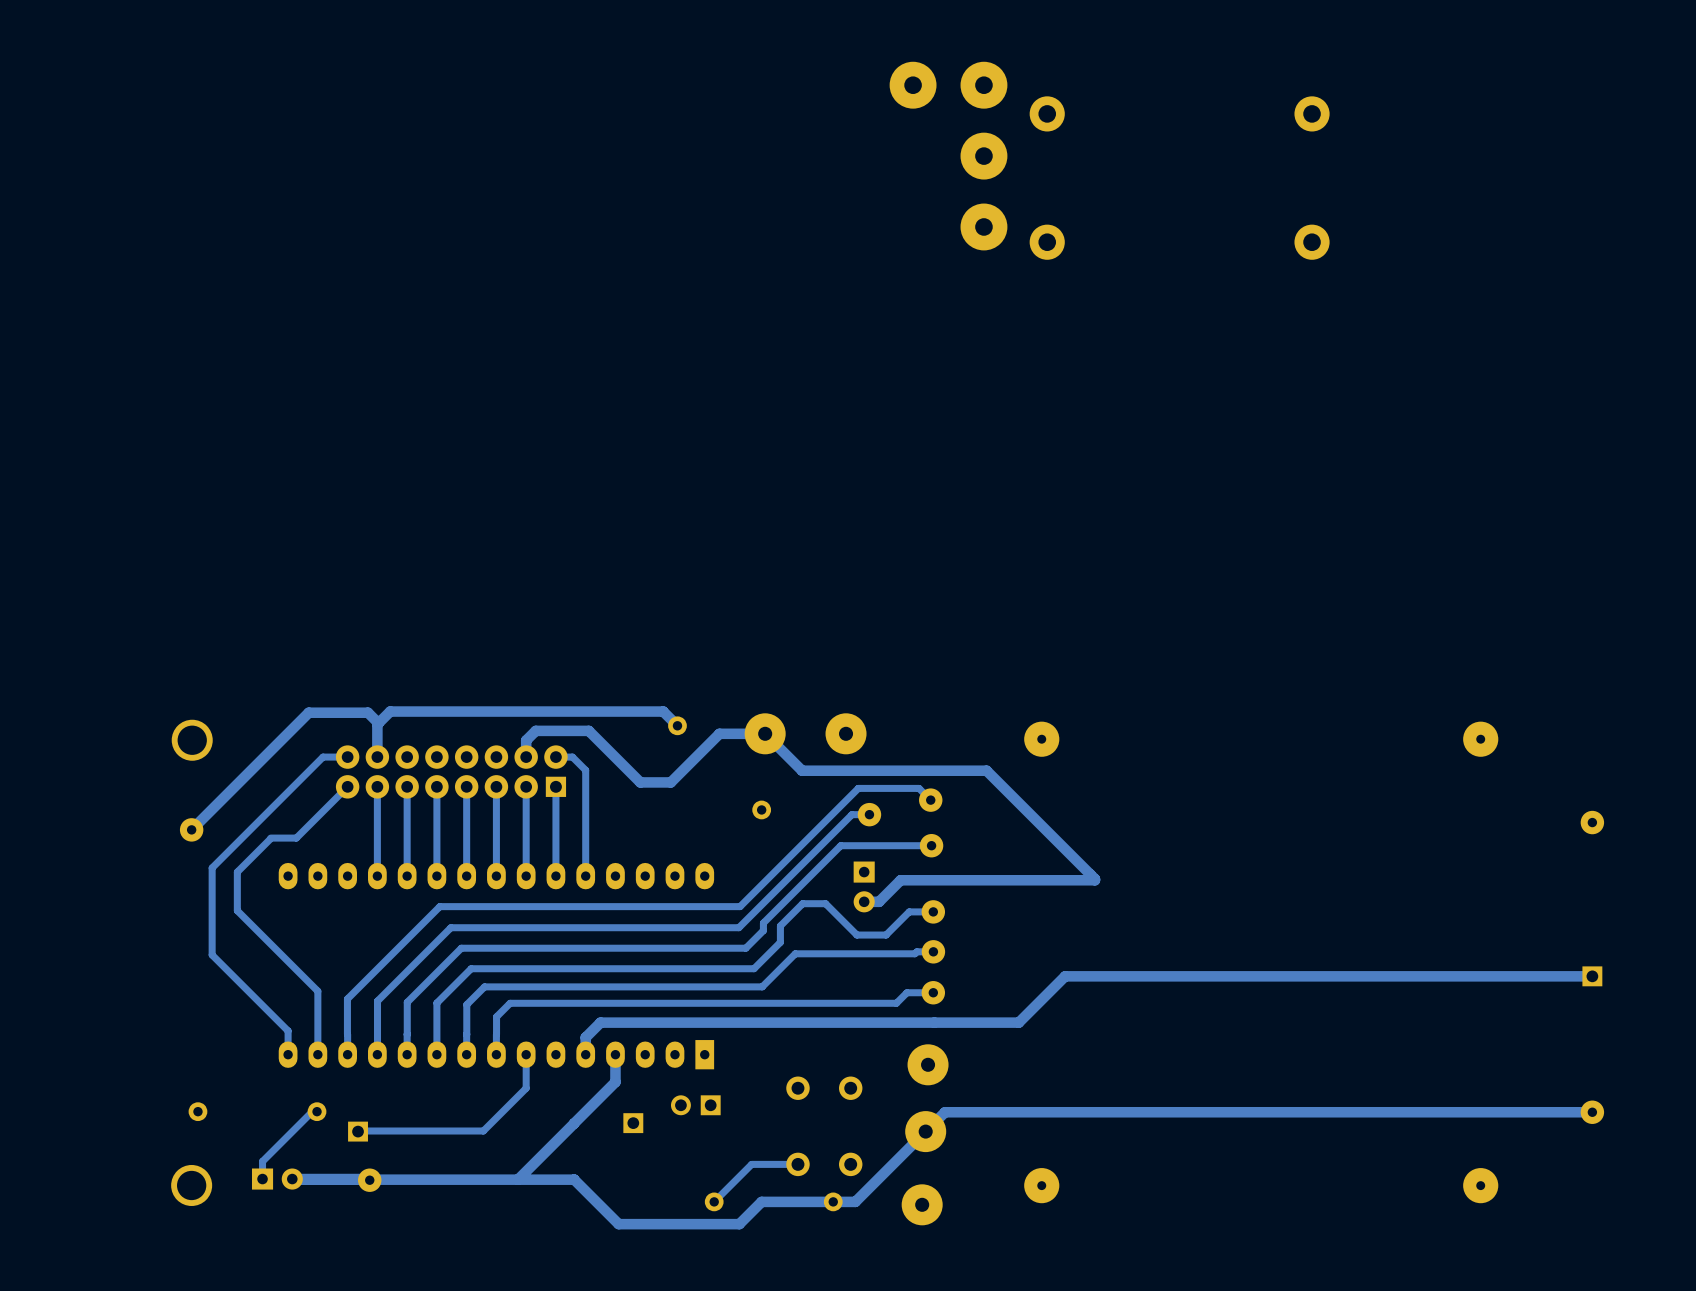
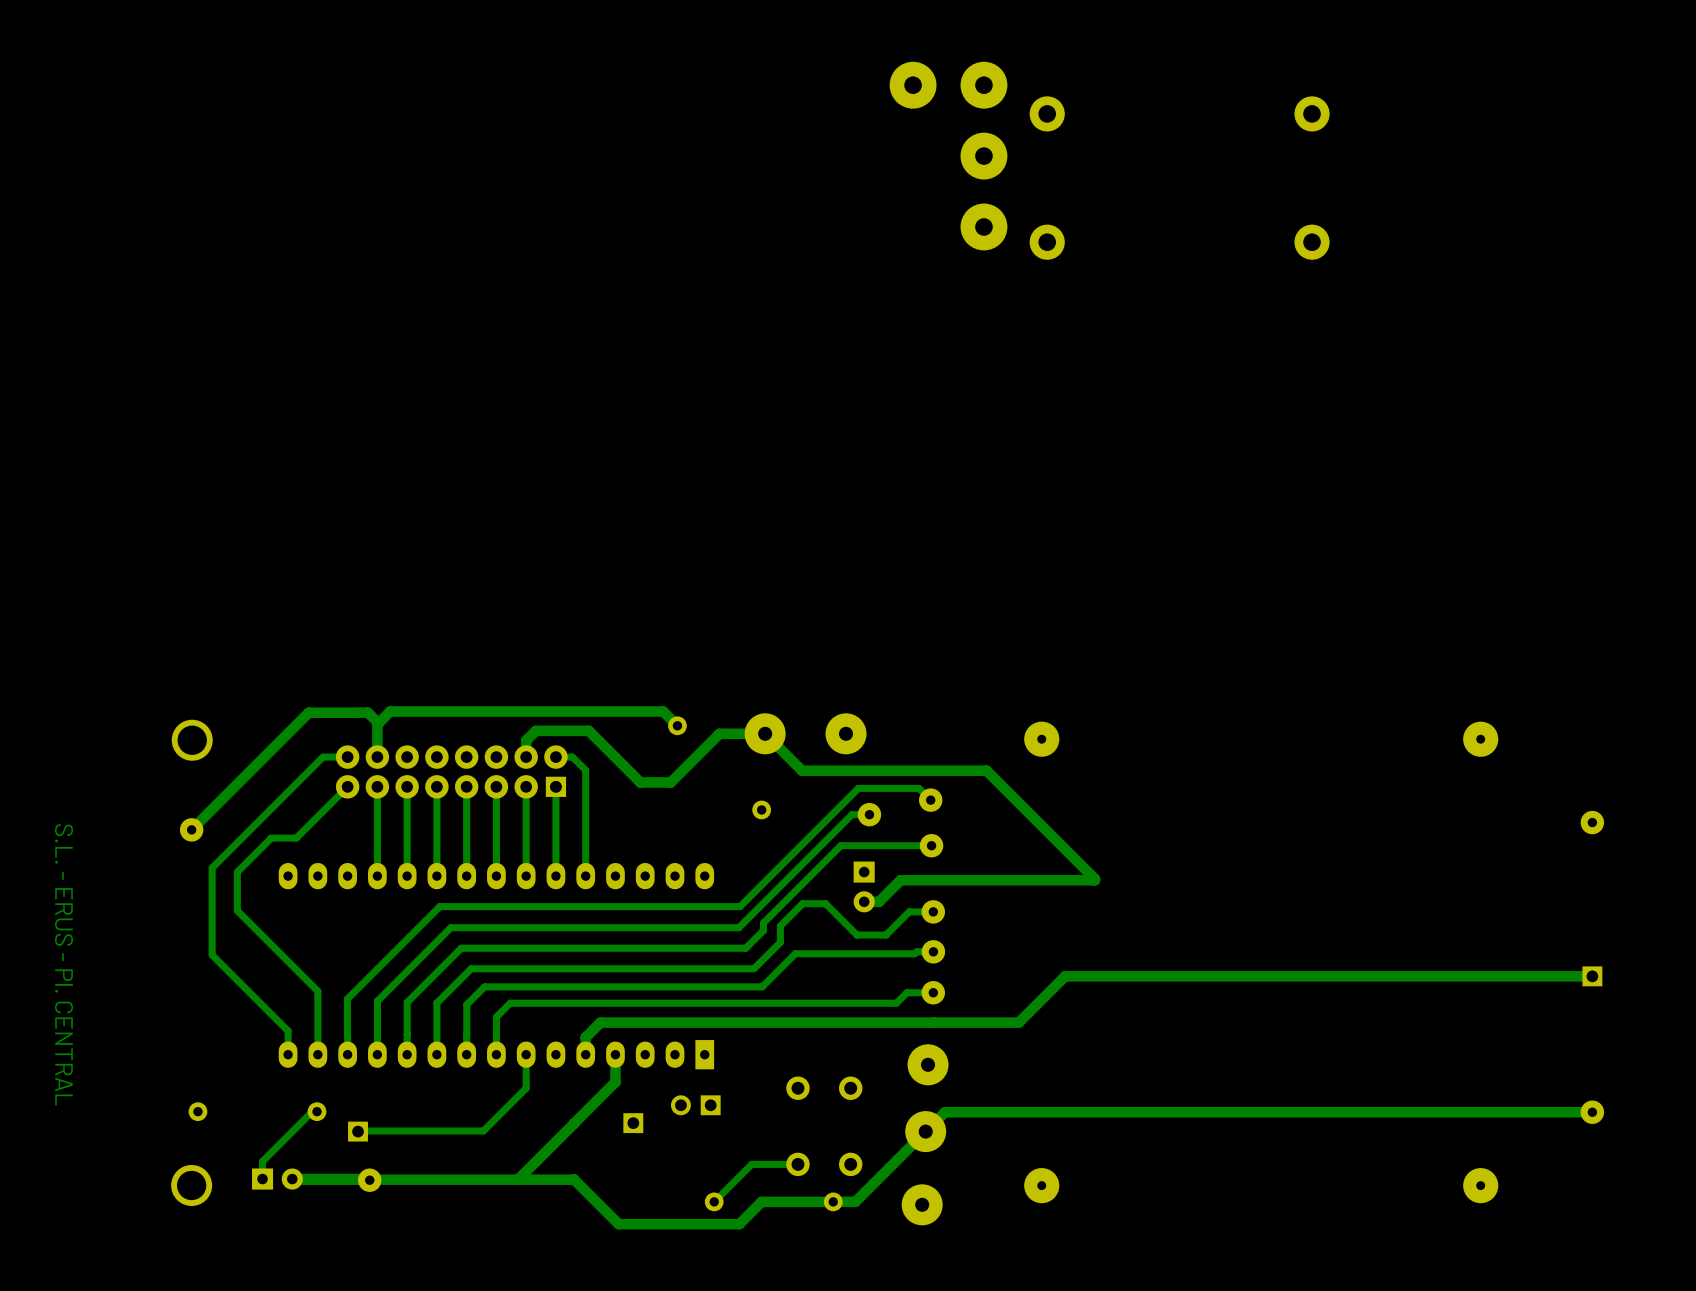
text: none -> S.L. - ERUS - Pl. CENTRAL (63, 964)

